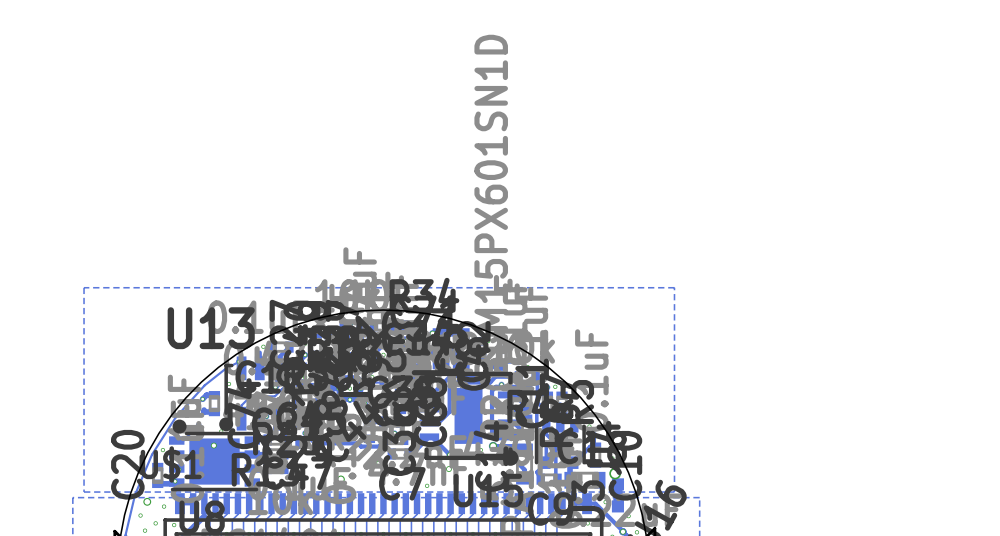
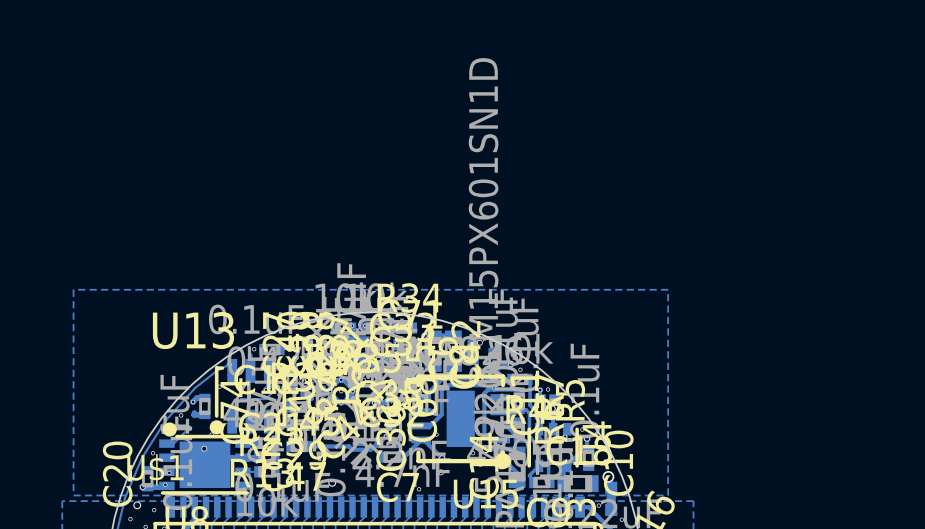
via: none -> (142, 487)

